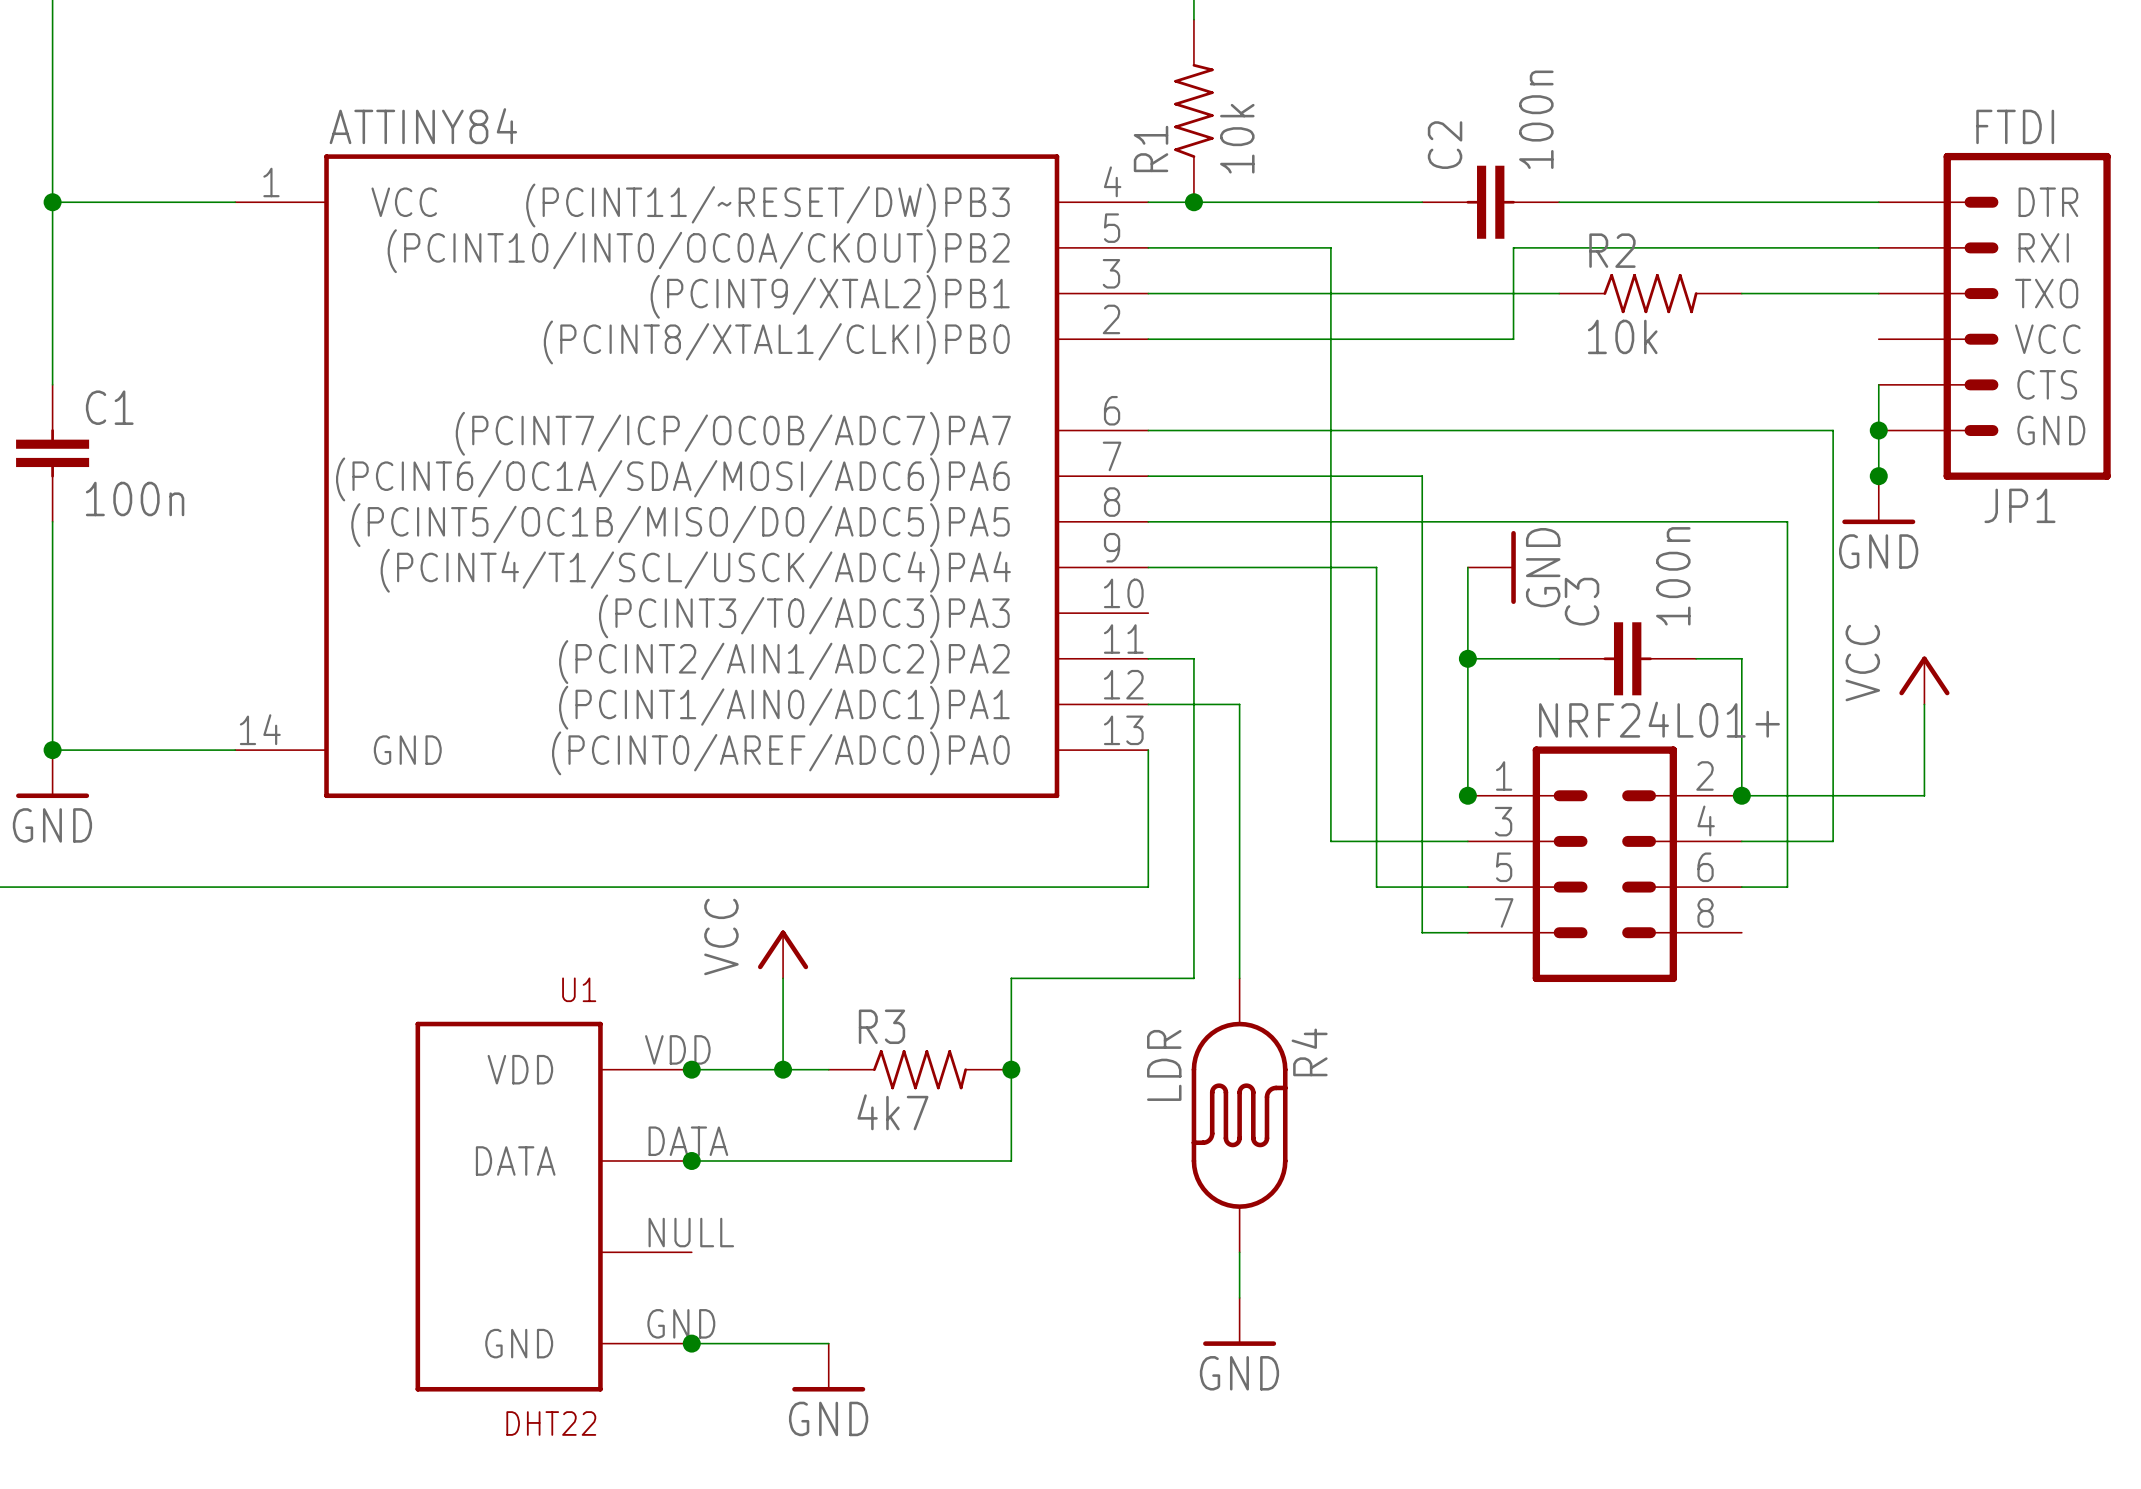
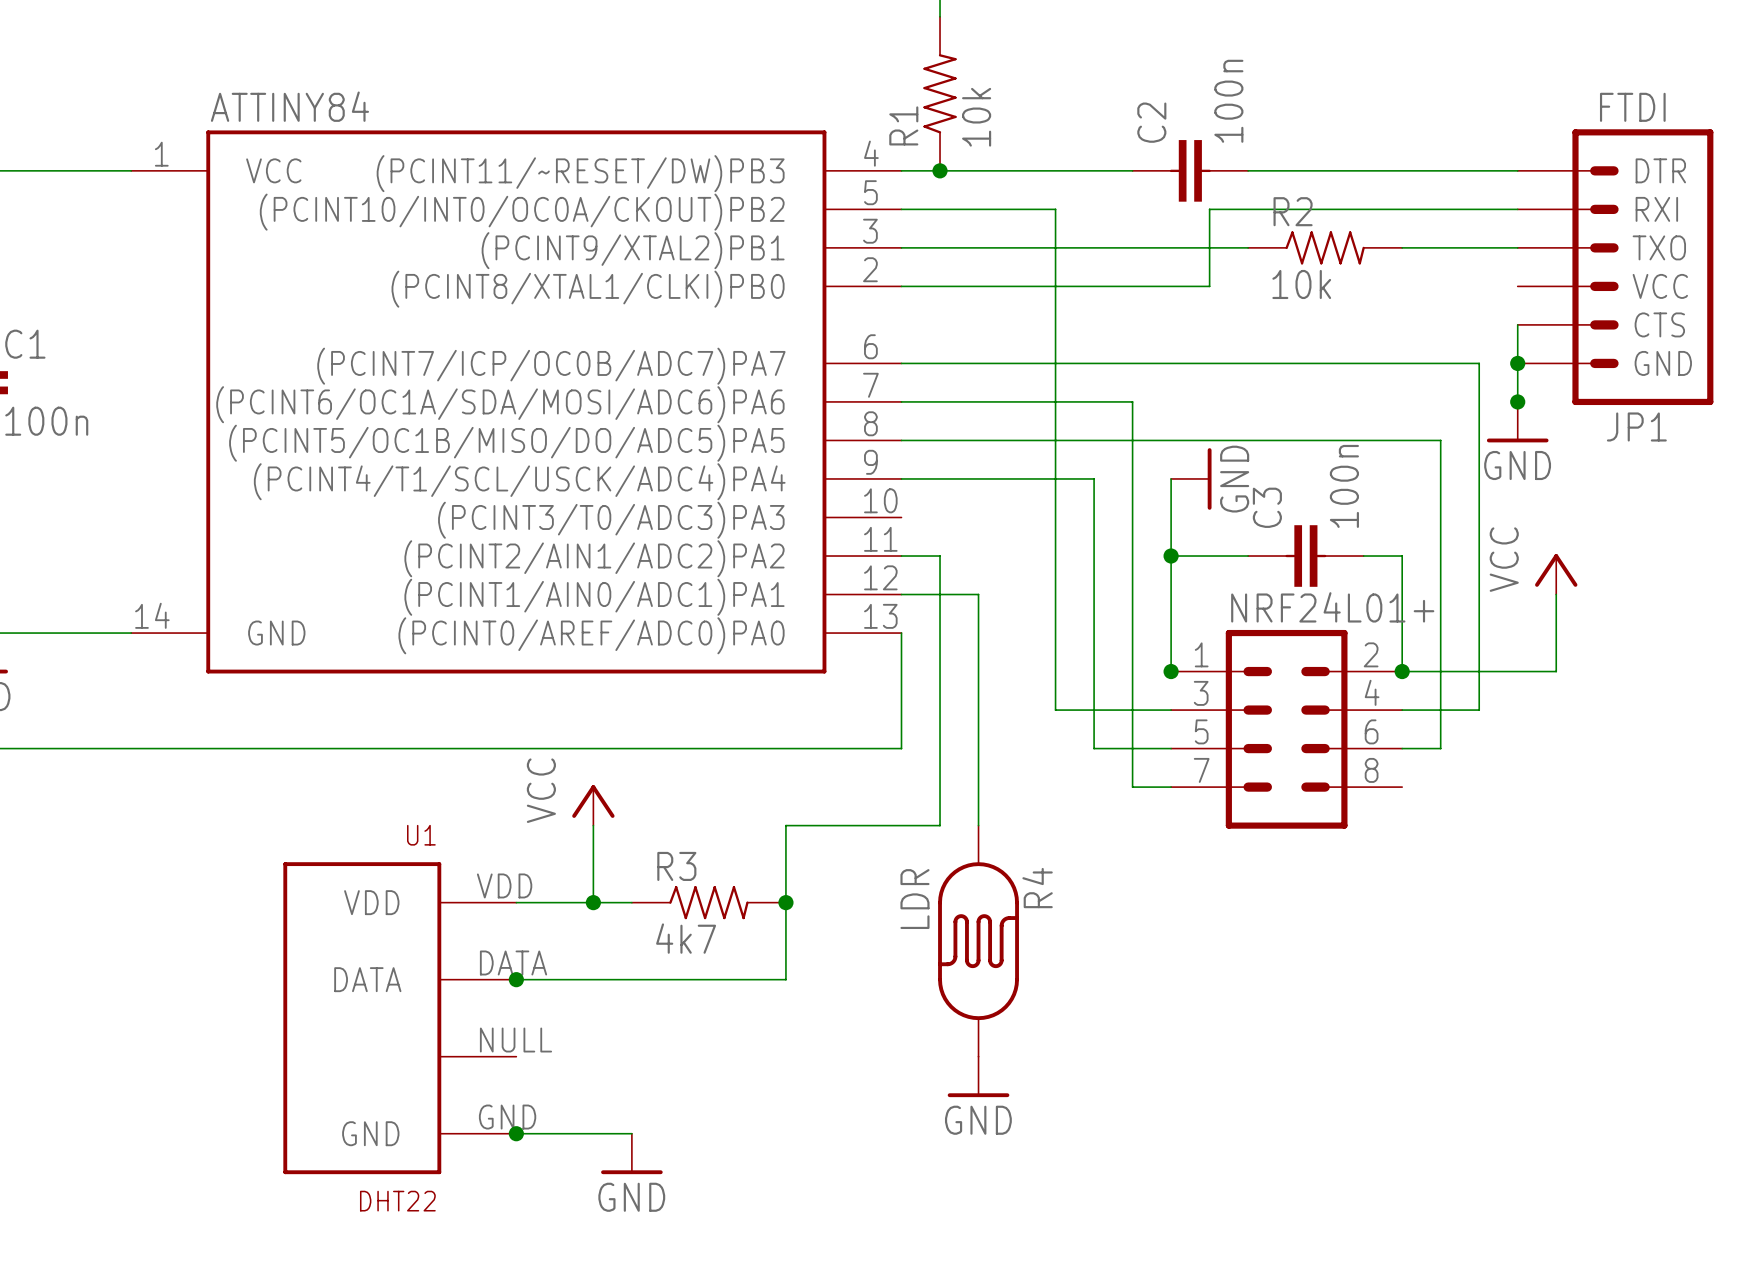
junction: (691, 1069) -> none
power symbol position: GND (1239, 1321) -> GND (978, 1076)

